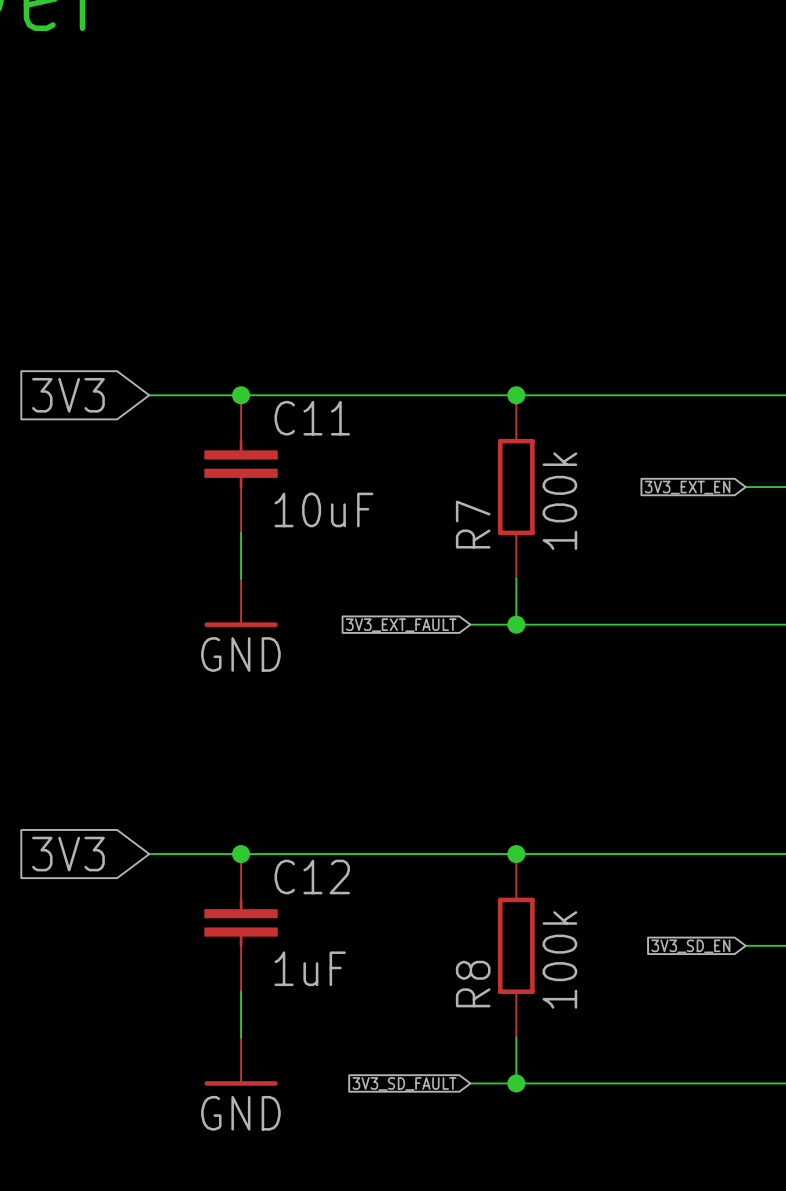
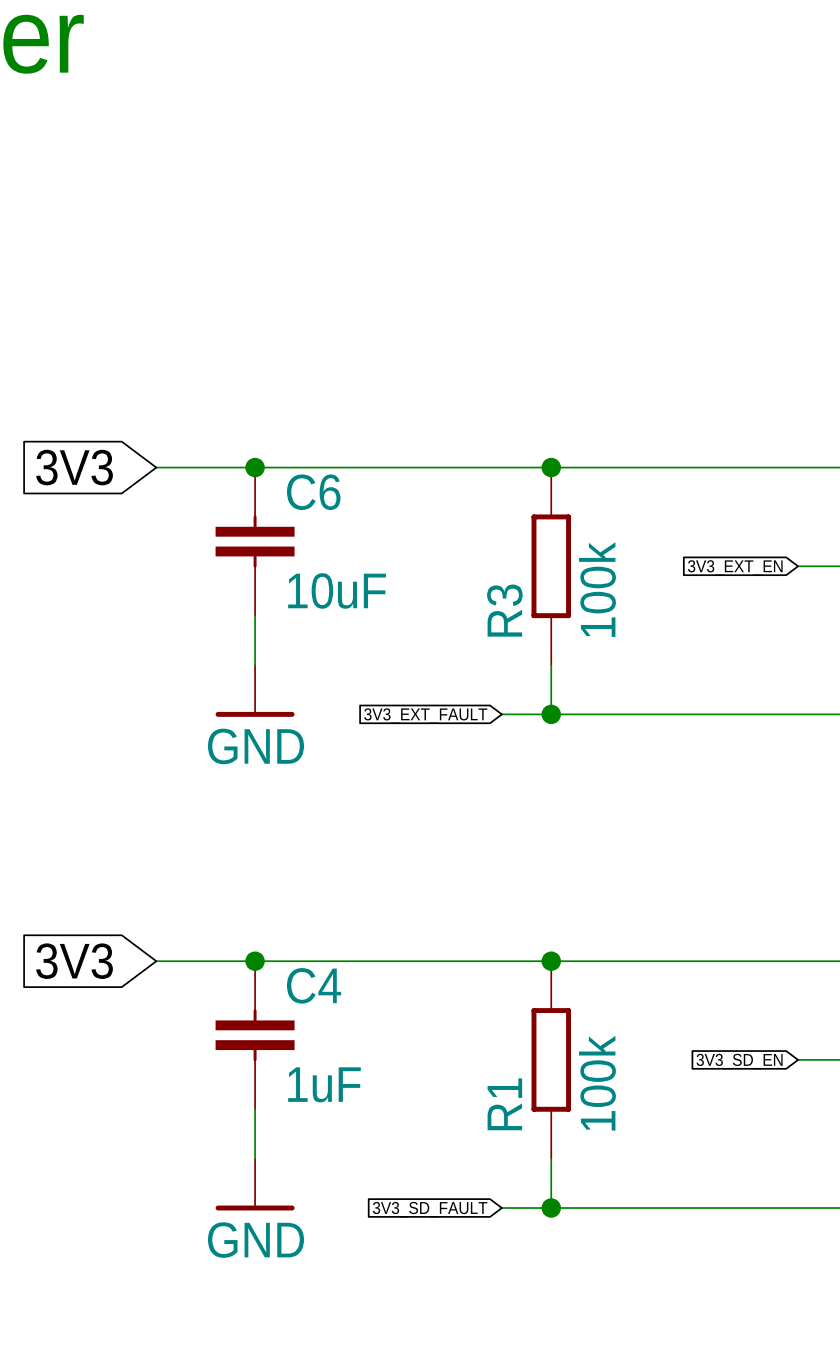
C11 name: C11 (312, 418) -> C6 (313, 492)
R7 name: R7 (473, 524) -> R3 (504, 610)
C12 name: C12 (312, 877) -> C4 (314, 985)
R8 name: R8 (473, 984) -> R1 (504, 1104)

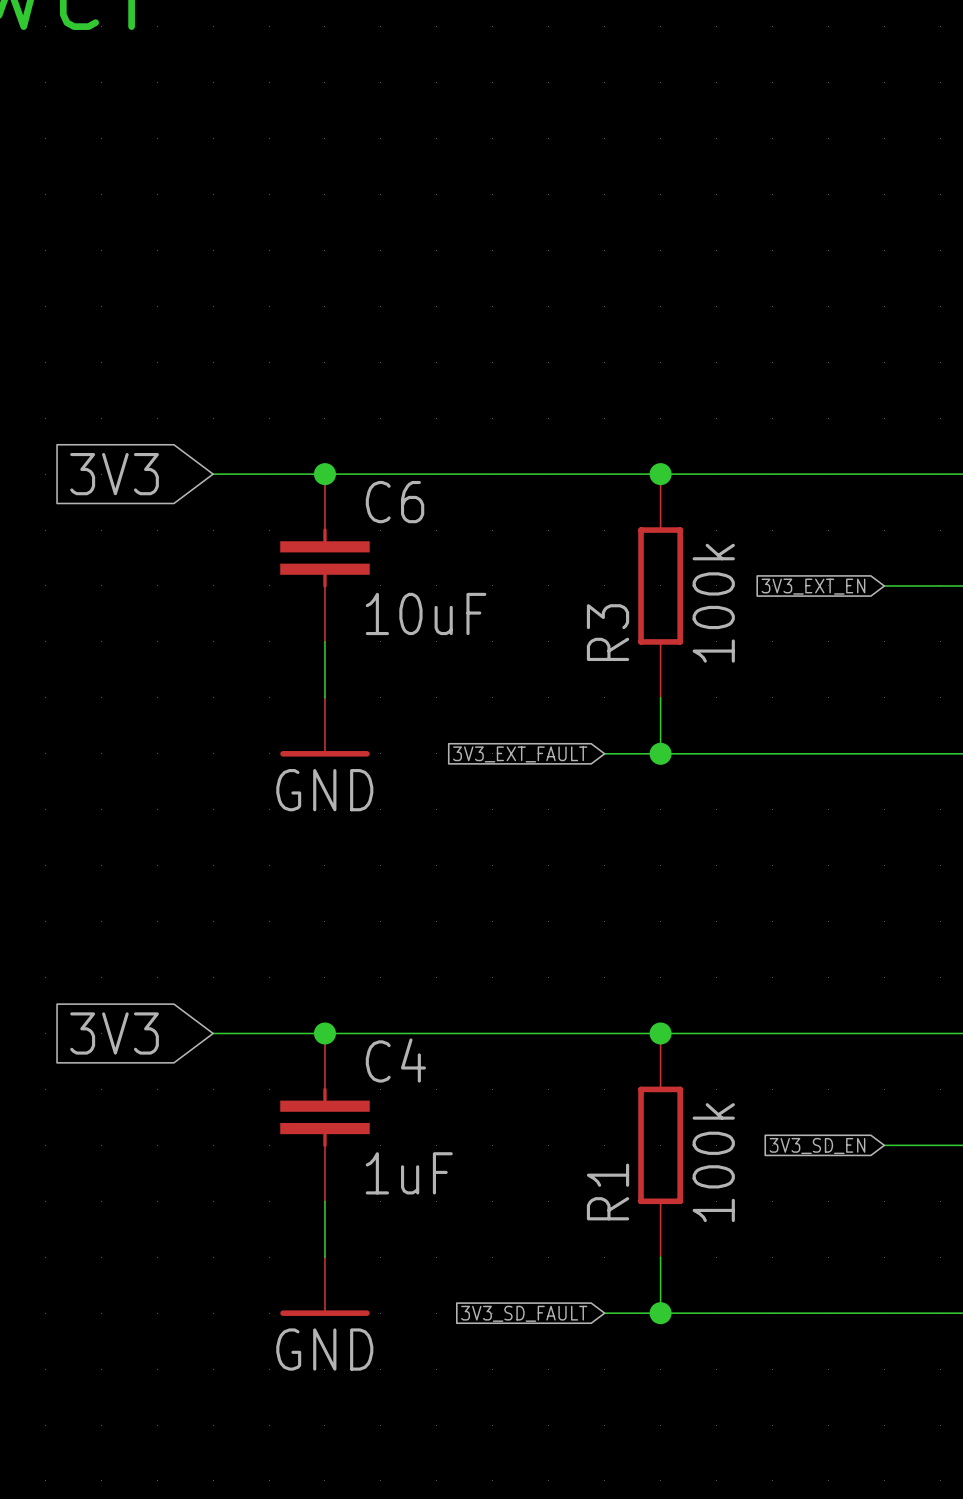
wire: none -> (884, 585) (940, 585)
global label position: 3V3_EXT_EN (735, 567) -> 3V3_EXT_EN (813, 586)
wire: none -> (884, 1145) (940, 1145)
global label position: 3V3_SD_EN (739, 1061) -> 3V3_SD_EN (817, 1146)

